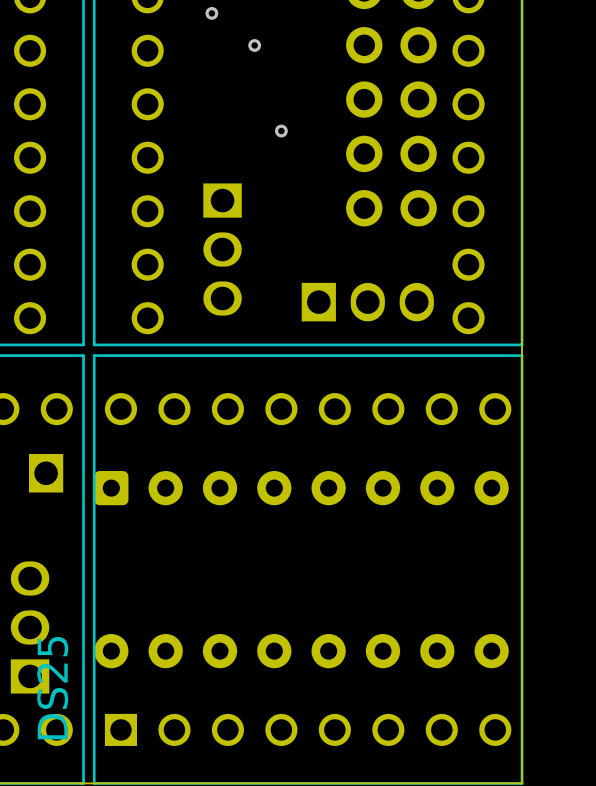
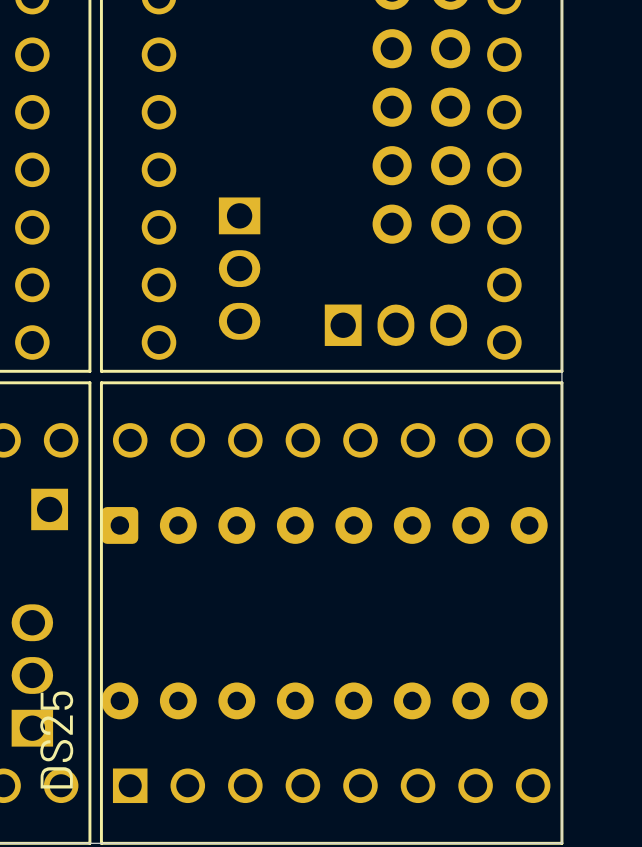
via: (211, 13) -> none
via: (254, 45) -> none
via: (281, 131) -> none

